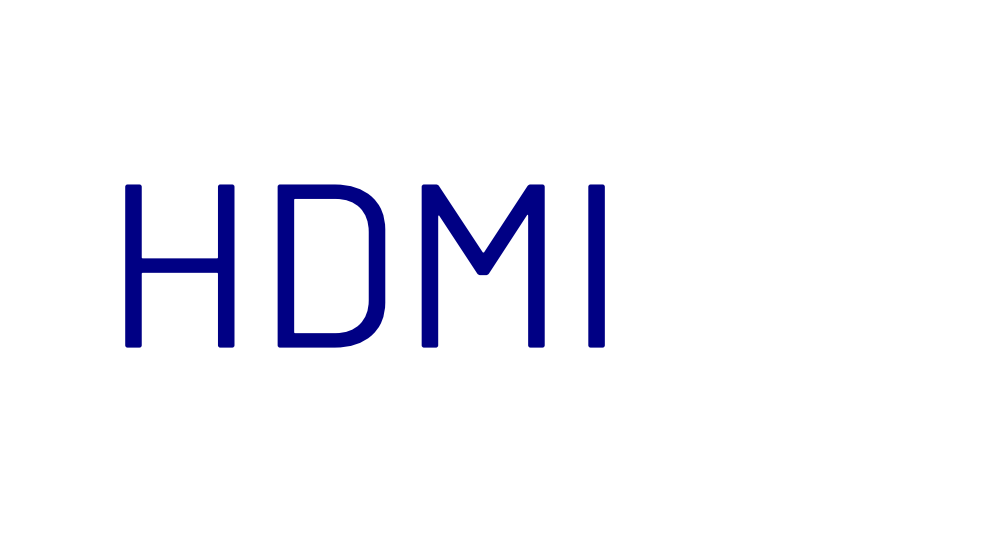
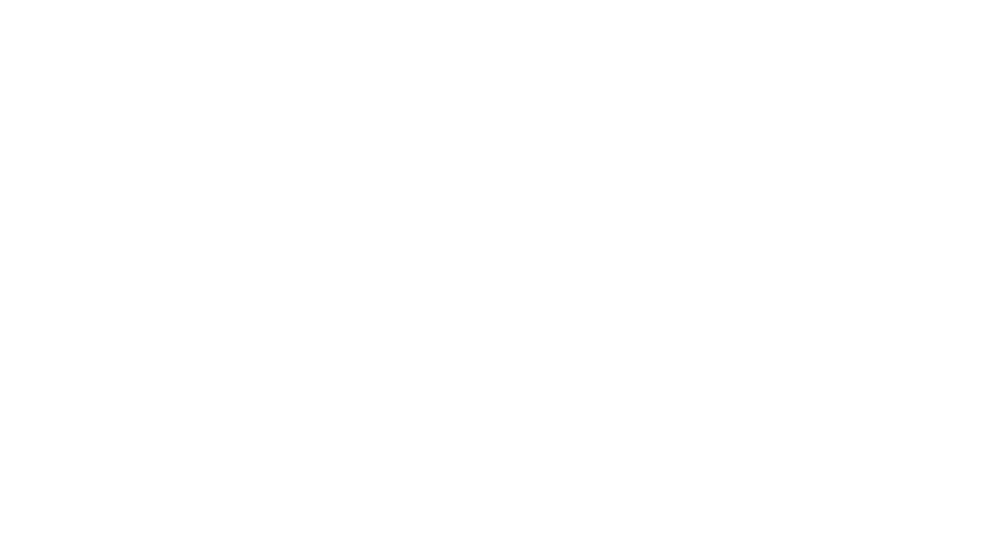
text: HDMI (365, 266) -> none

